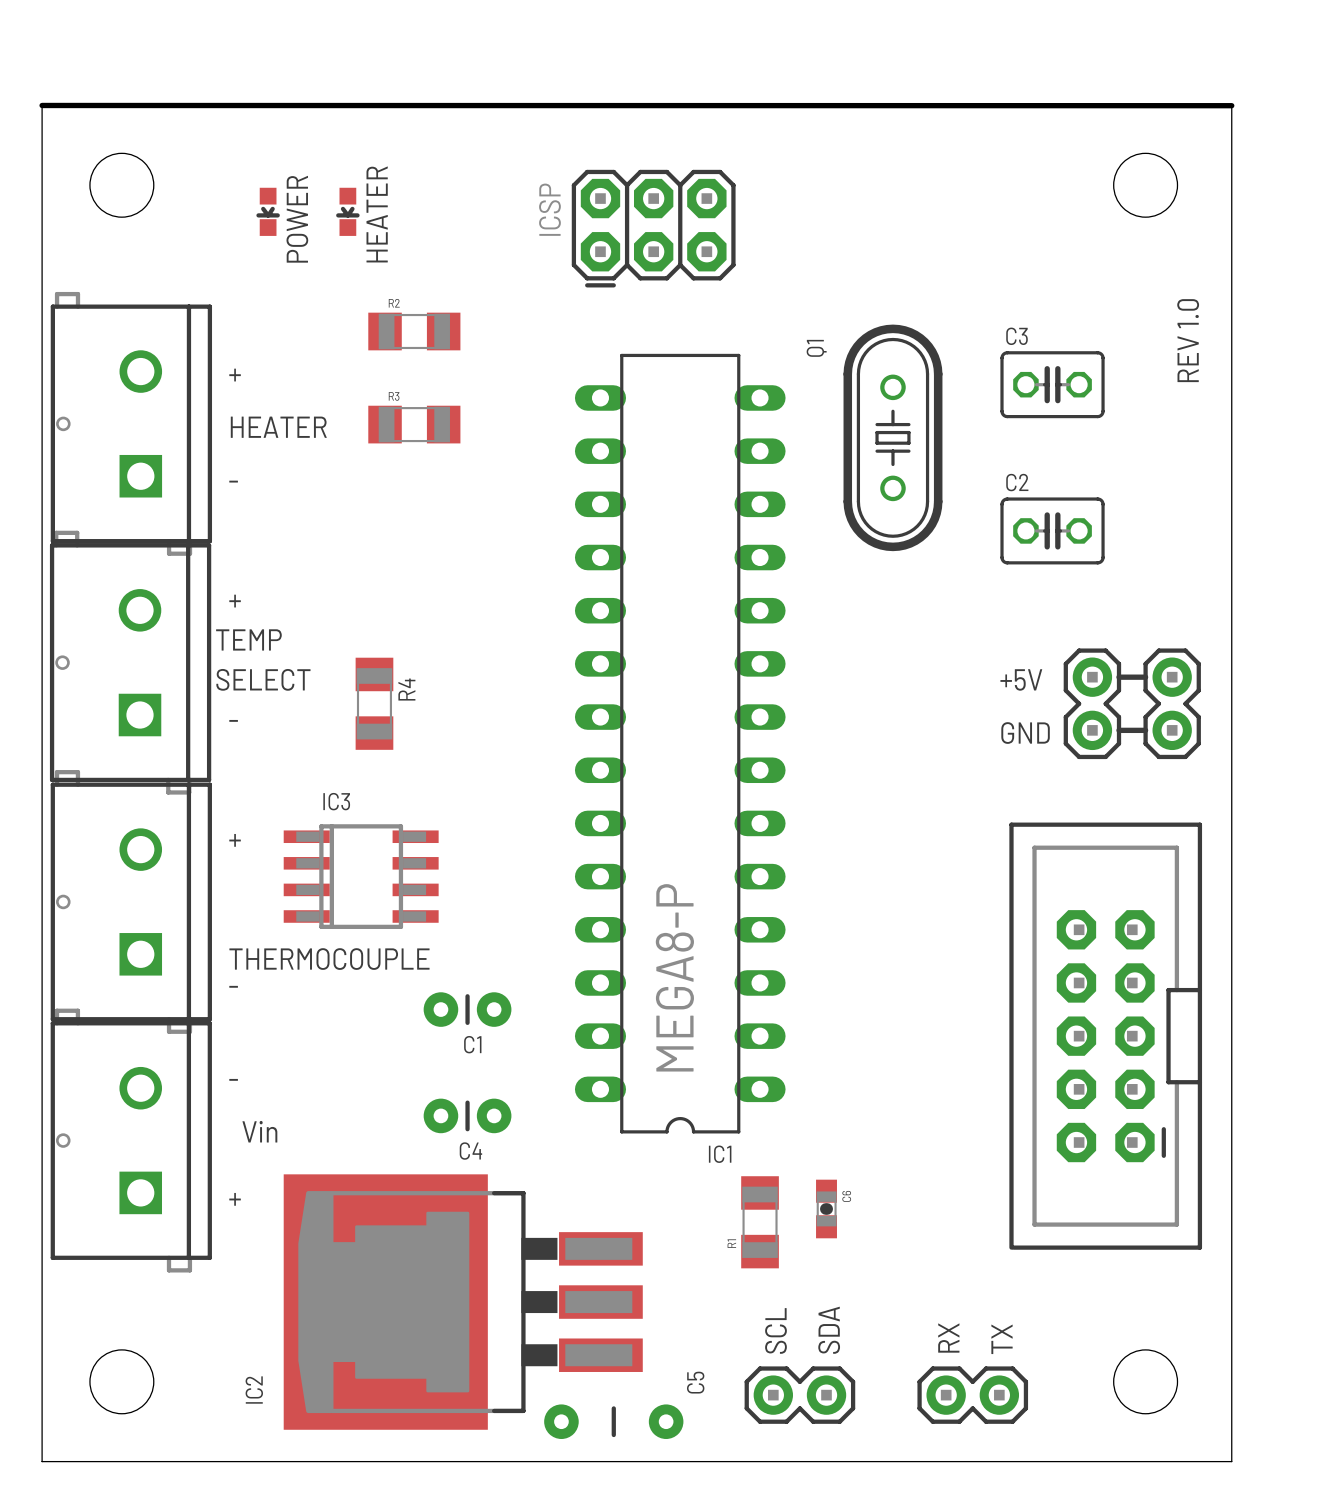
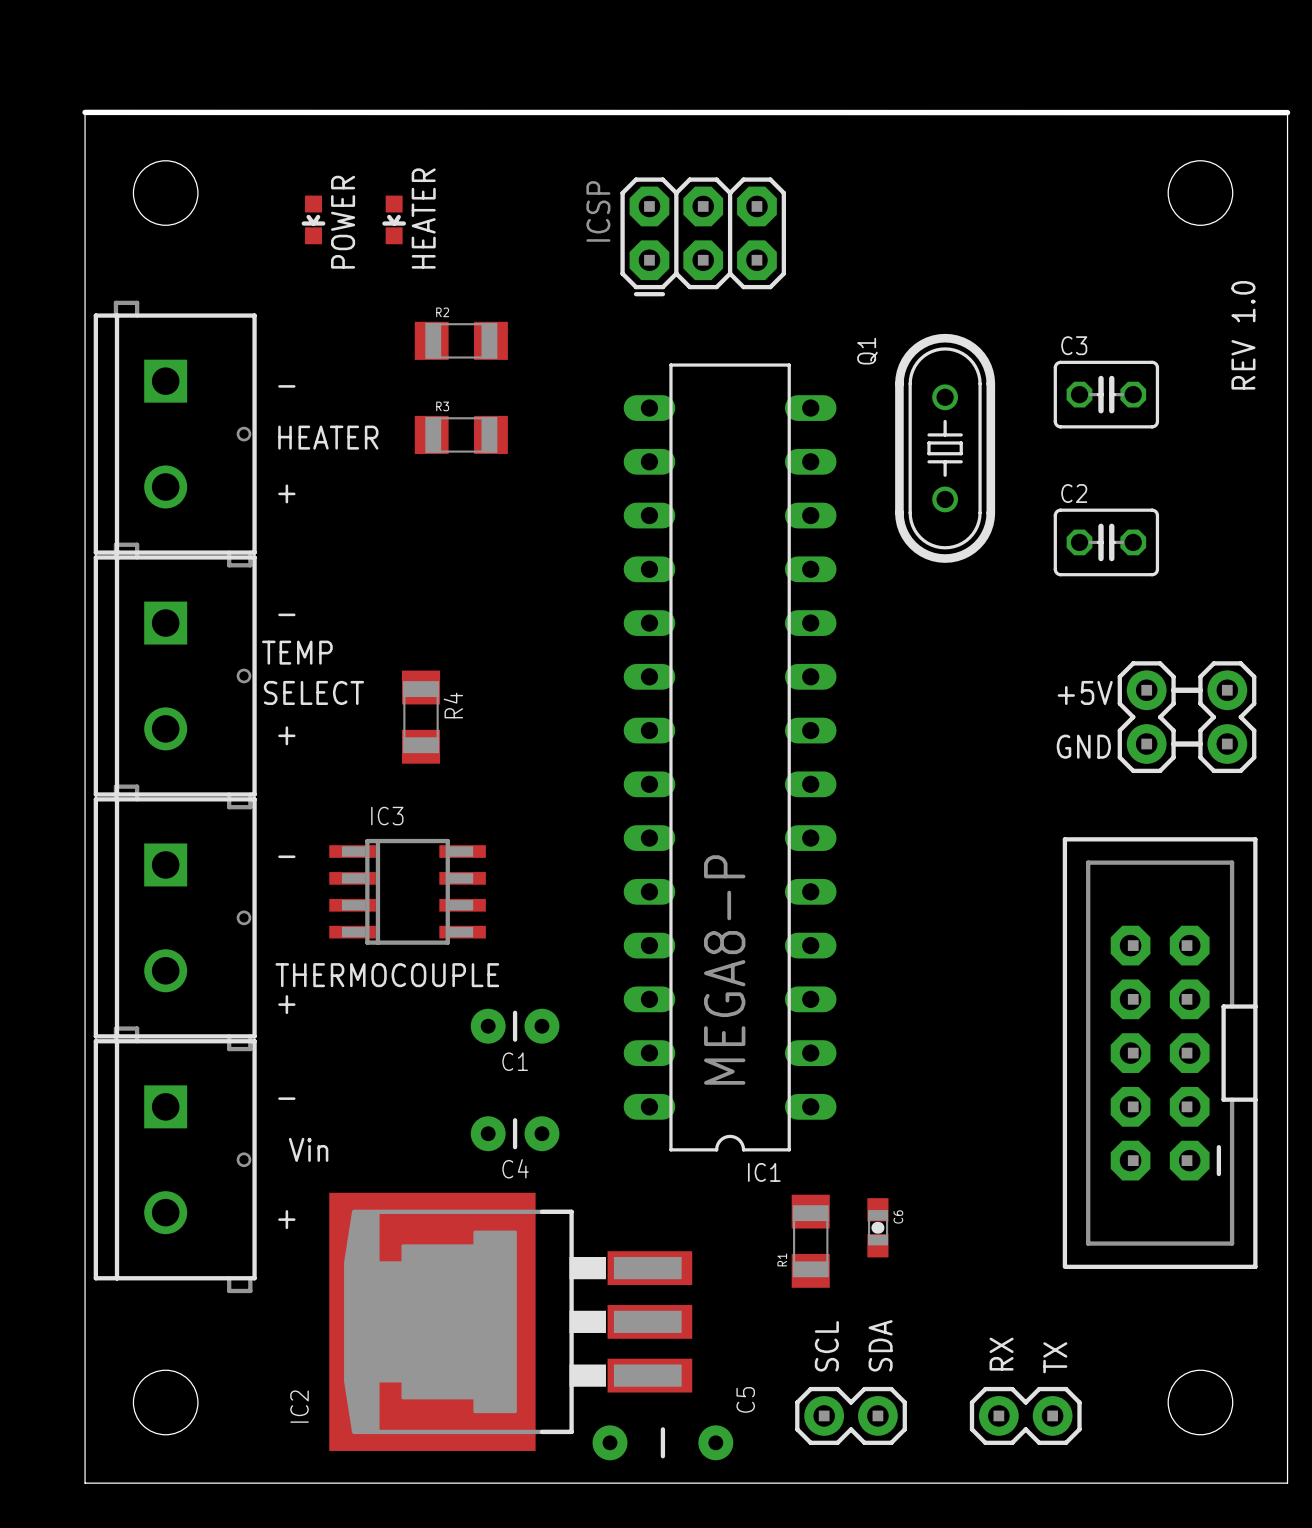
text: + (235, 375) -> - (286, 386)
part rotation: 0° (131, 423) -> 180° (175, 434)
text: - (233, 481) -> + (286, 493)
text: + (235, 601) -> - (286, 614)
part rotation: 0° (130, 662) -> 180° (175, 675)
text: - (233, 720) -> + (286, 735)
text: + (235, 840) -> - (286, 856)
part rotation: 0° (131, 901) -> 180° (175, 917)
text: - (233, 986) -> + (286, 1004)
part rotation: 0° (131, 1140) -> 180° (175, 1159)

